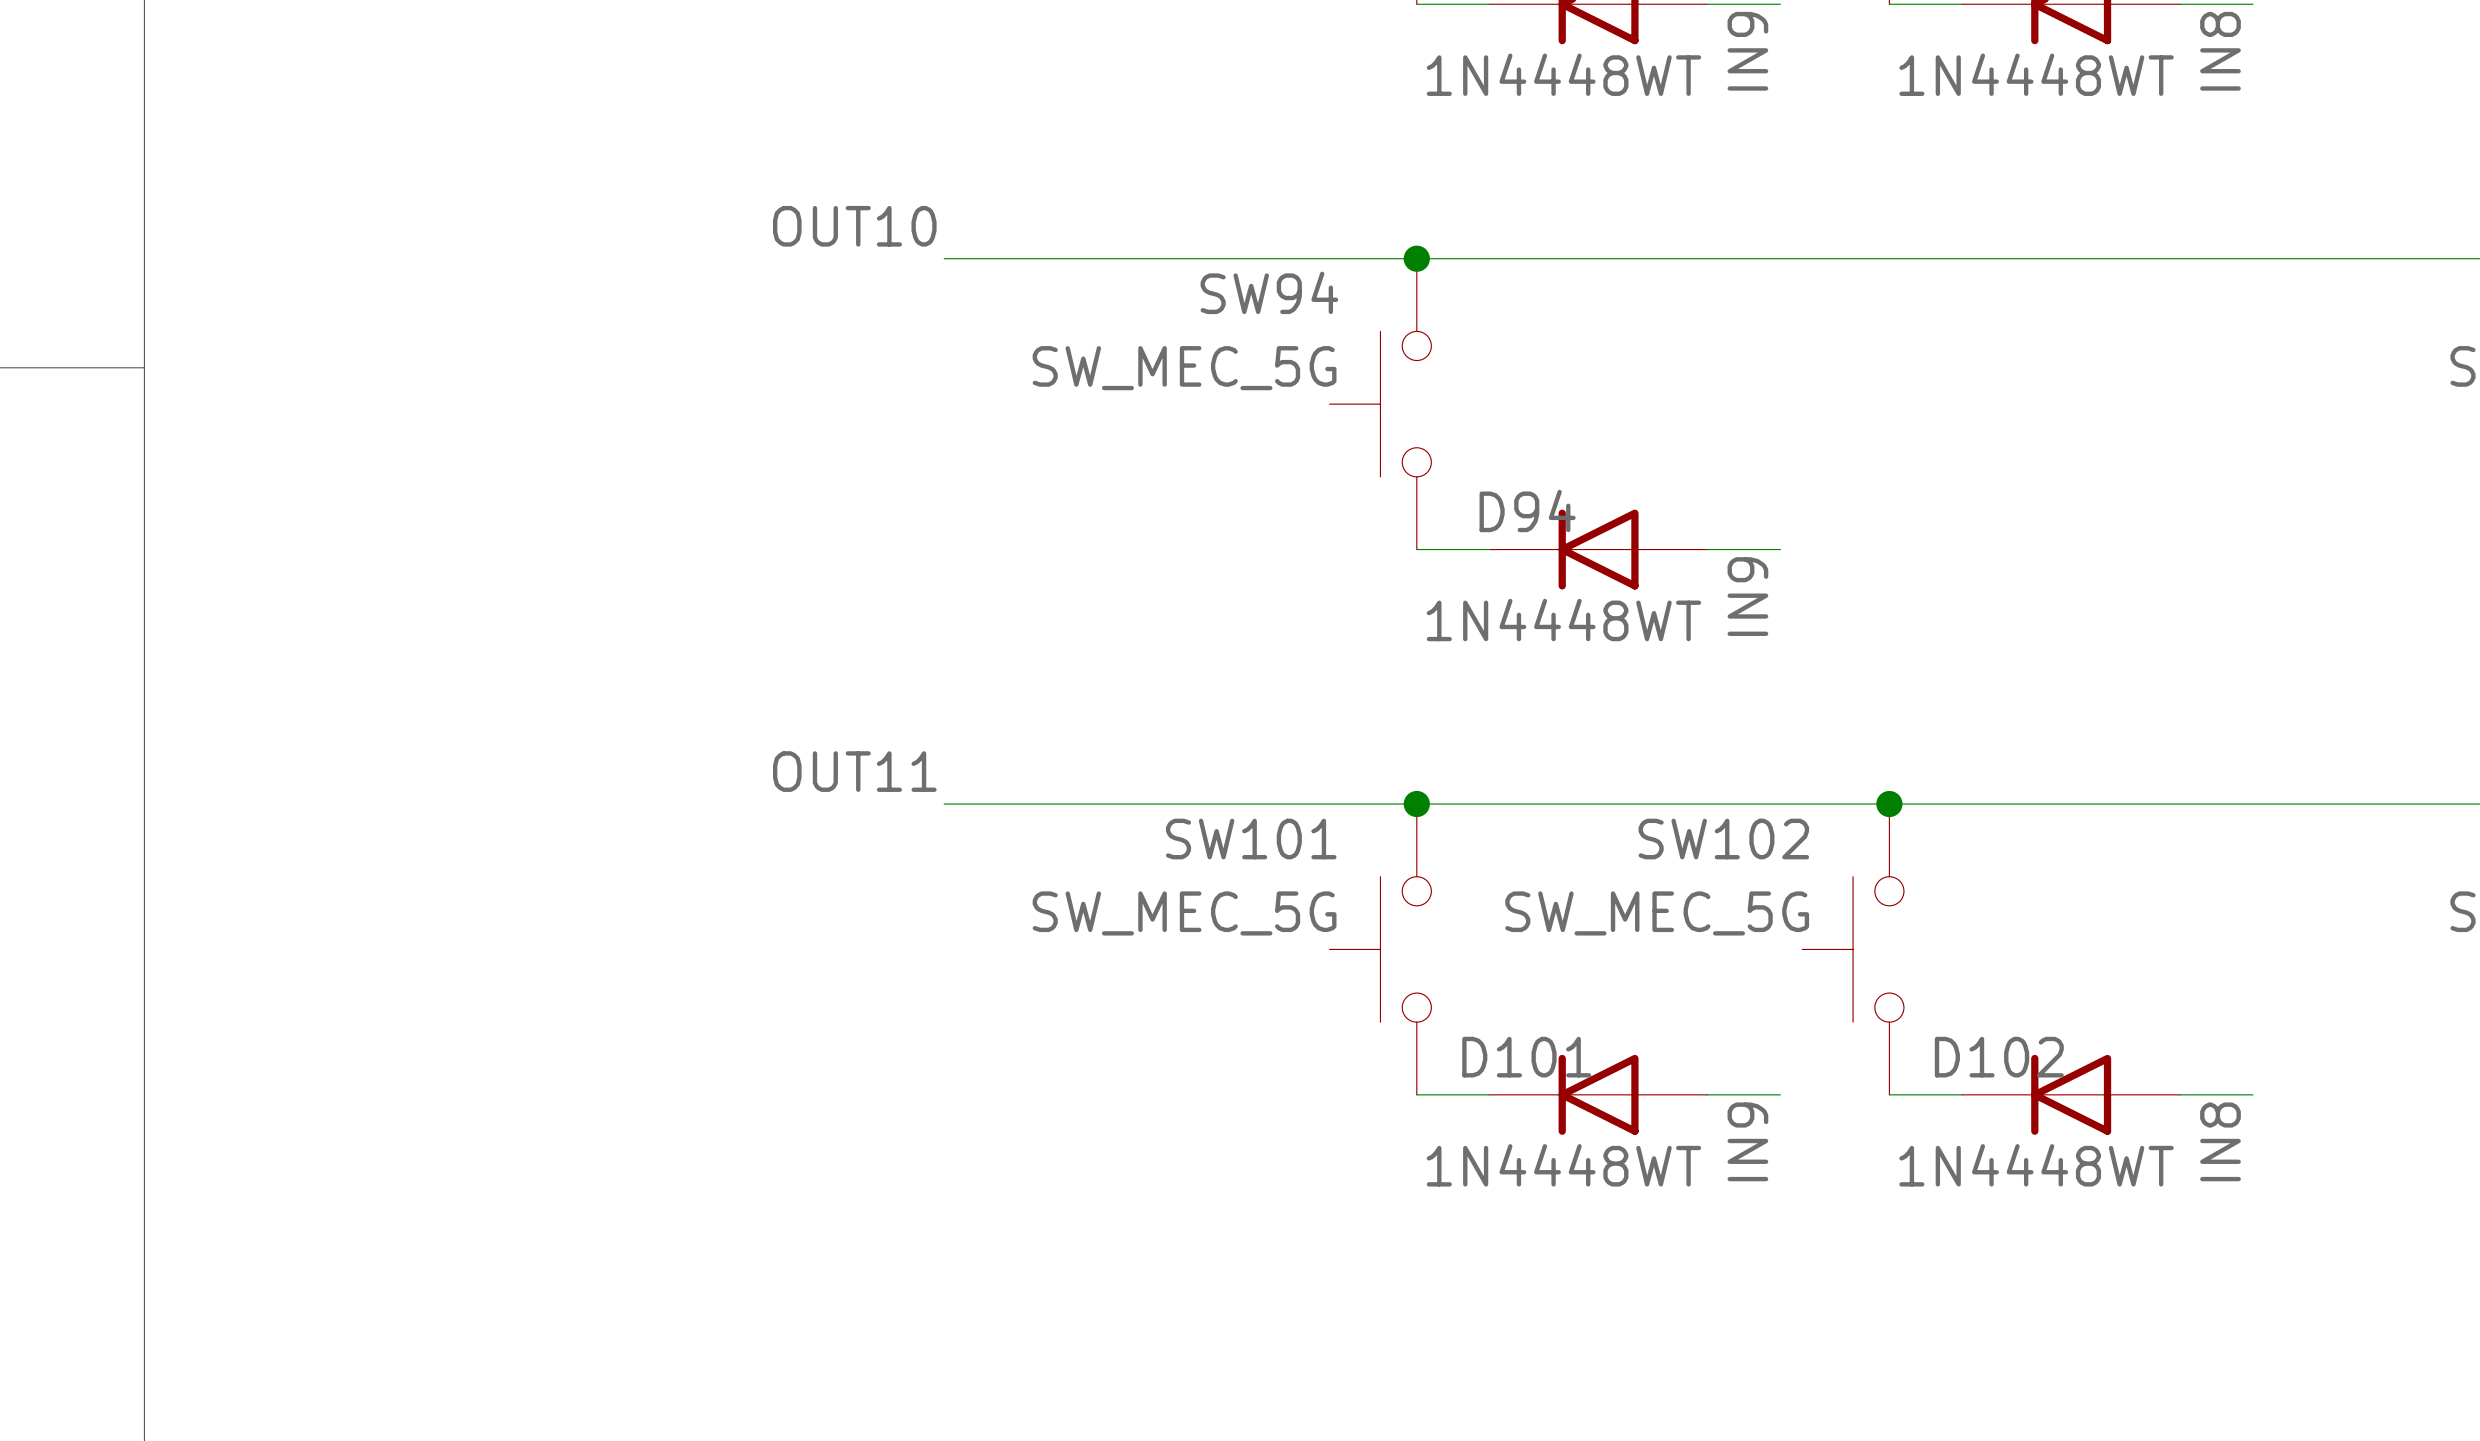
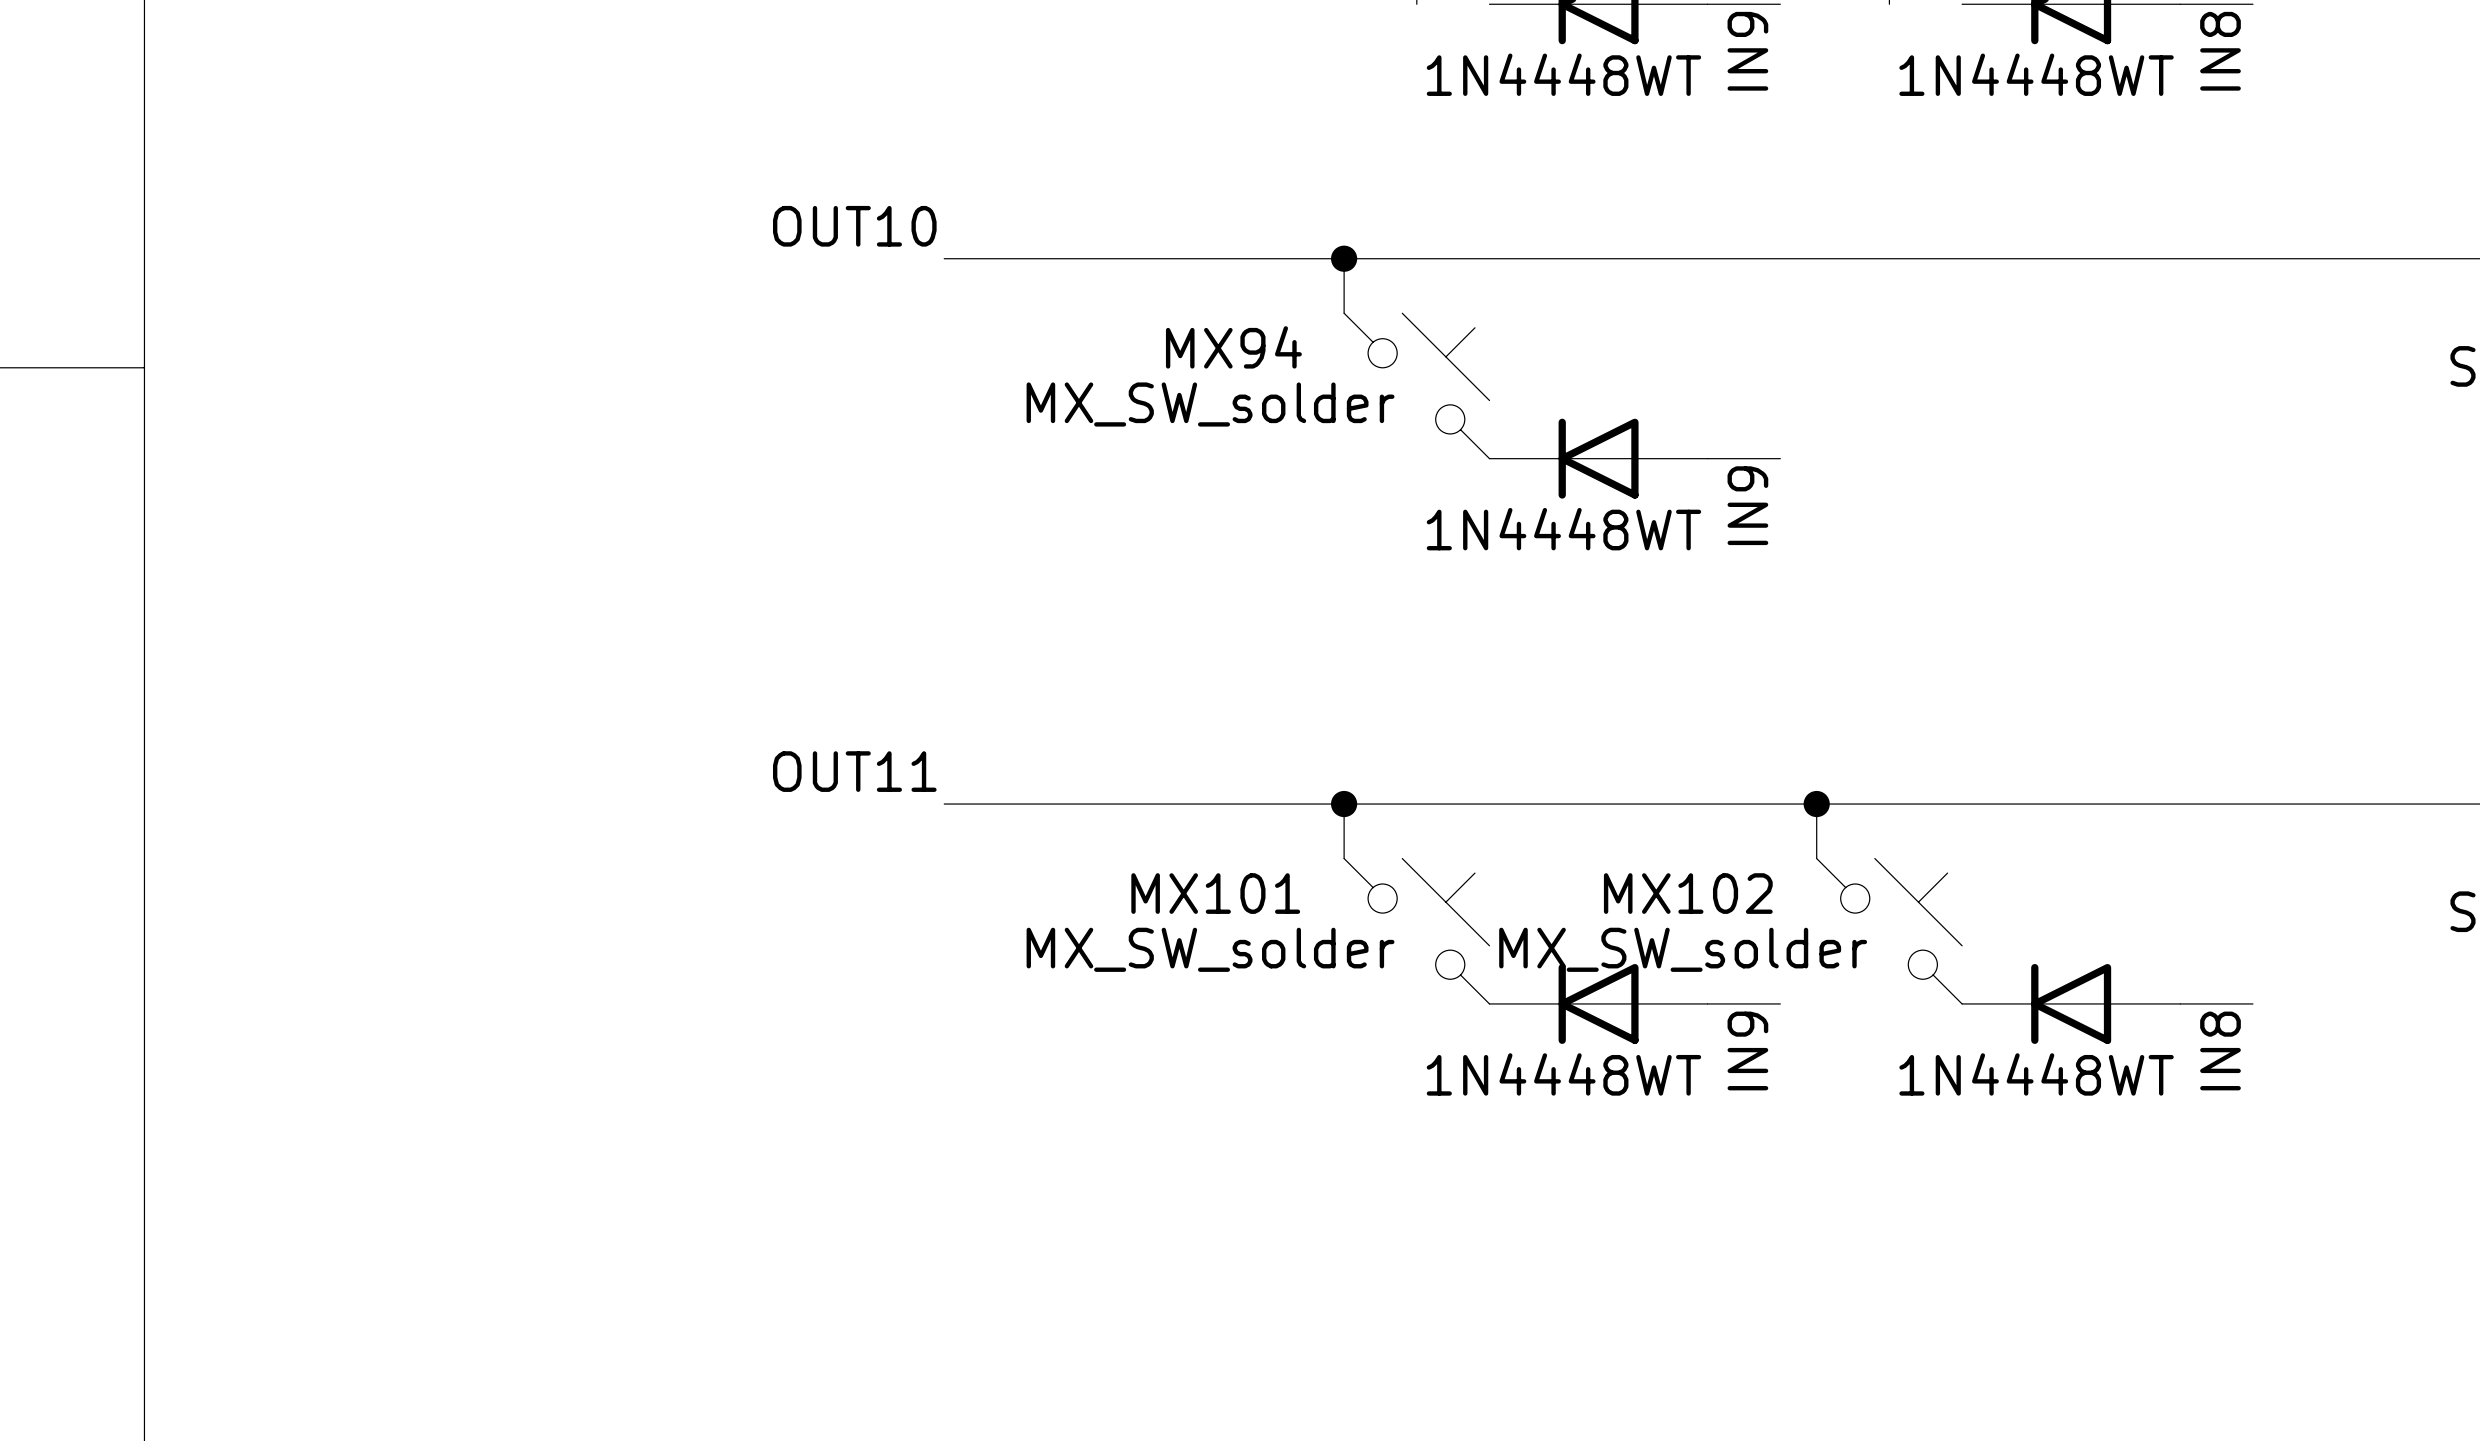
wire: (1416, 4) (1489, 4) -> none
wire: (1889, 4) (1962, 4) -> none
wire: none -> (1344, 258) (1344, 313)
junction position: (1416, 258) -> (1344, 258)
MX94: none -> MX_SW_solder (1416, 385)
SW94: SW_MEC_5G (1380, 404) -> none
part: none -> 1N4448WT (1598, 458)
wire: (1416, 549) (1489, 549) -> none
D94: 1N4448WT (1598, 549) -> none
wire: (1707, 549) (1780, 549) -> (1707, 458) (1780, 458)
label position: IN9 (1747, 596) -> IN9 (1747, 505)
wire: none -> (1344, 804) (1344, 858)
junction position: (1416, 804) -> (1344, 804)
wire: none -> (1816, 804) (1816, 858)
junction position: (1889, 804) -> (1816, 804)
MX101: none -> MX_SW_solder (1416, 931)
MX102: none -> MX_SW_solder (1889, 931)
SW101: SW_MEC_5G (1380, 949) -> none
SW102: SW_MEC_5G (1853, 949) -> none
part: none -> 1N4448WT (1598, 1003)
part: none -> 1N4448WT (2071, 1003)
wire: (1416, 1094) (1489, 1094) -> none
D101: 1N4448WT (1598, 1094) -> none
wire: (1707, 1094) (1780, 1094) -> (1707, 1003) (1780, 1003)
wire: (1889, 1094) (1962, 1094) -> none
D102: 1N4448WT (2071, 1094) -> none
wire: (2180, 1094) (2252, 1094) -> (2180, 1003) (2252, 1003)
label position: IN9 (1747, 1141) -> IN9 (1747, 1050)
label position: IN8 (2220, 1141) -> IN8 (2220, 1050)

